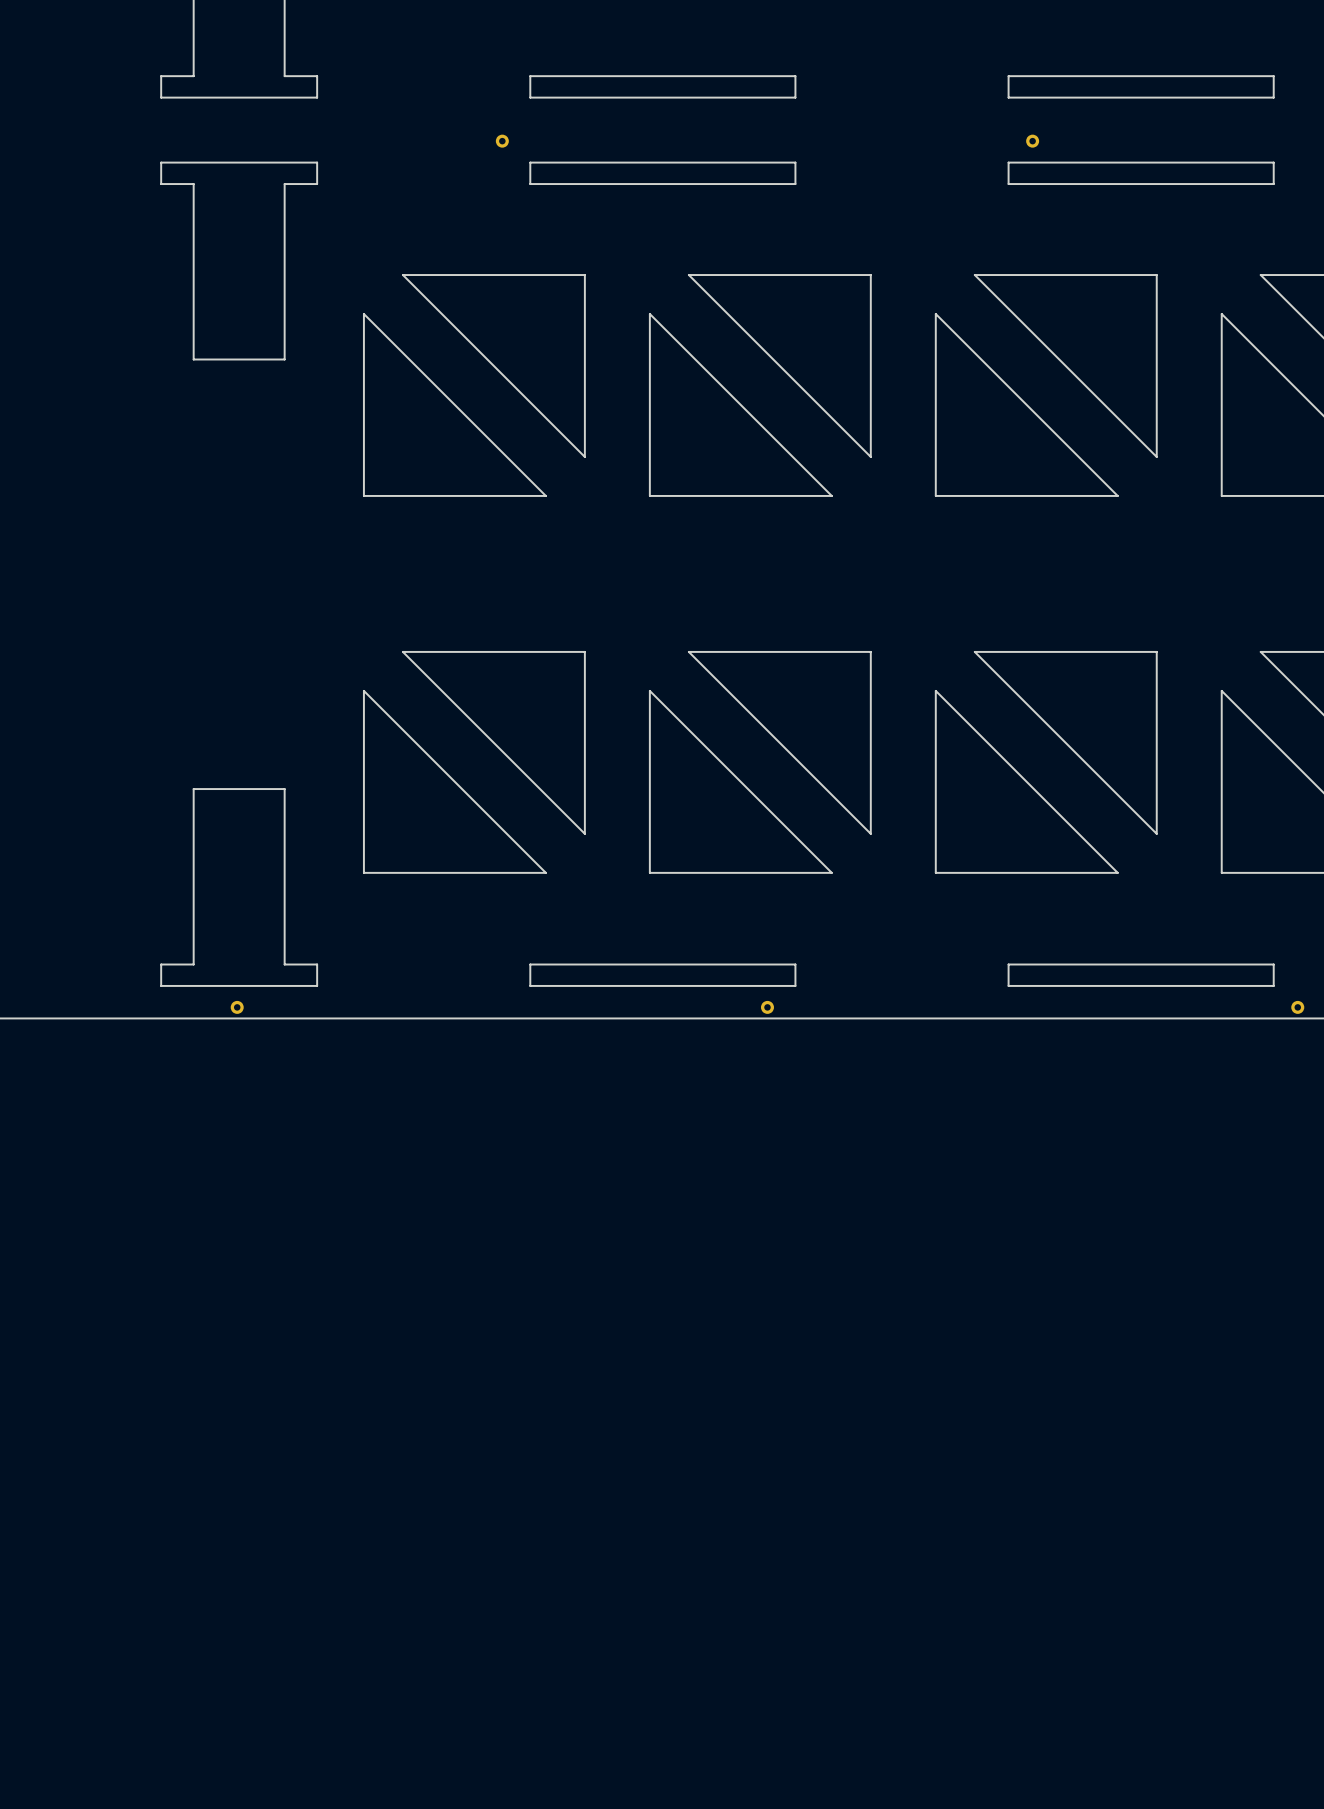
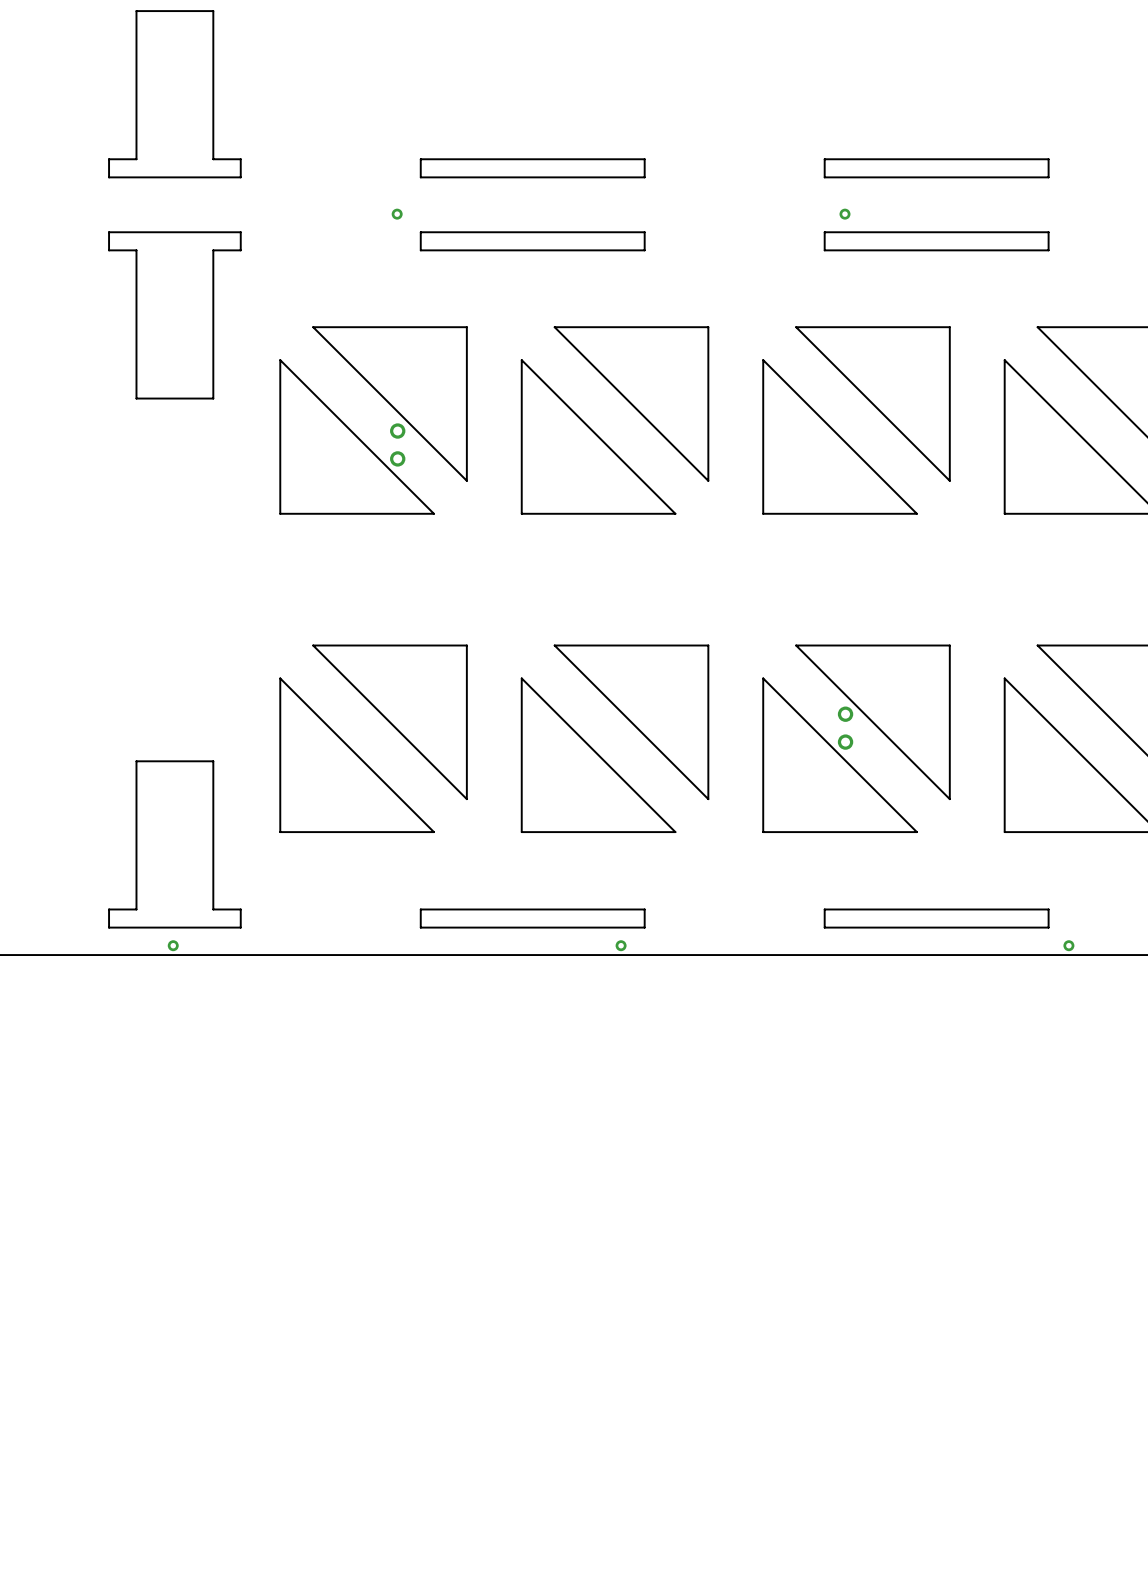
part: none -> (397, 444)
part: none -> (845, 728)

